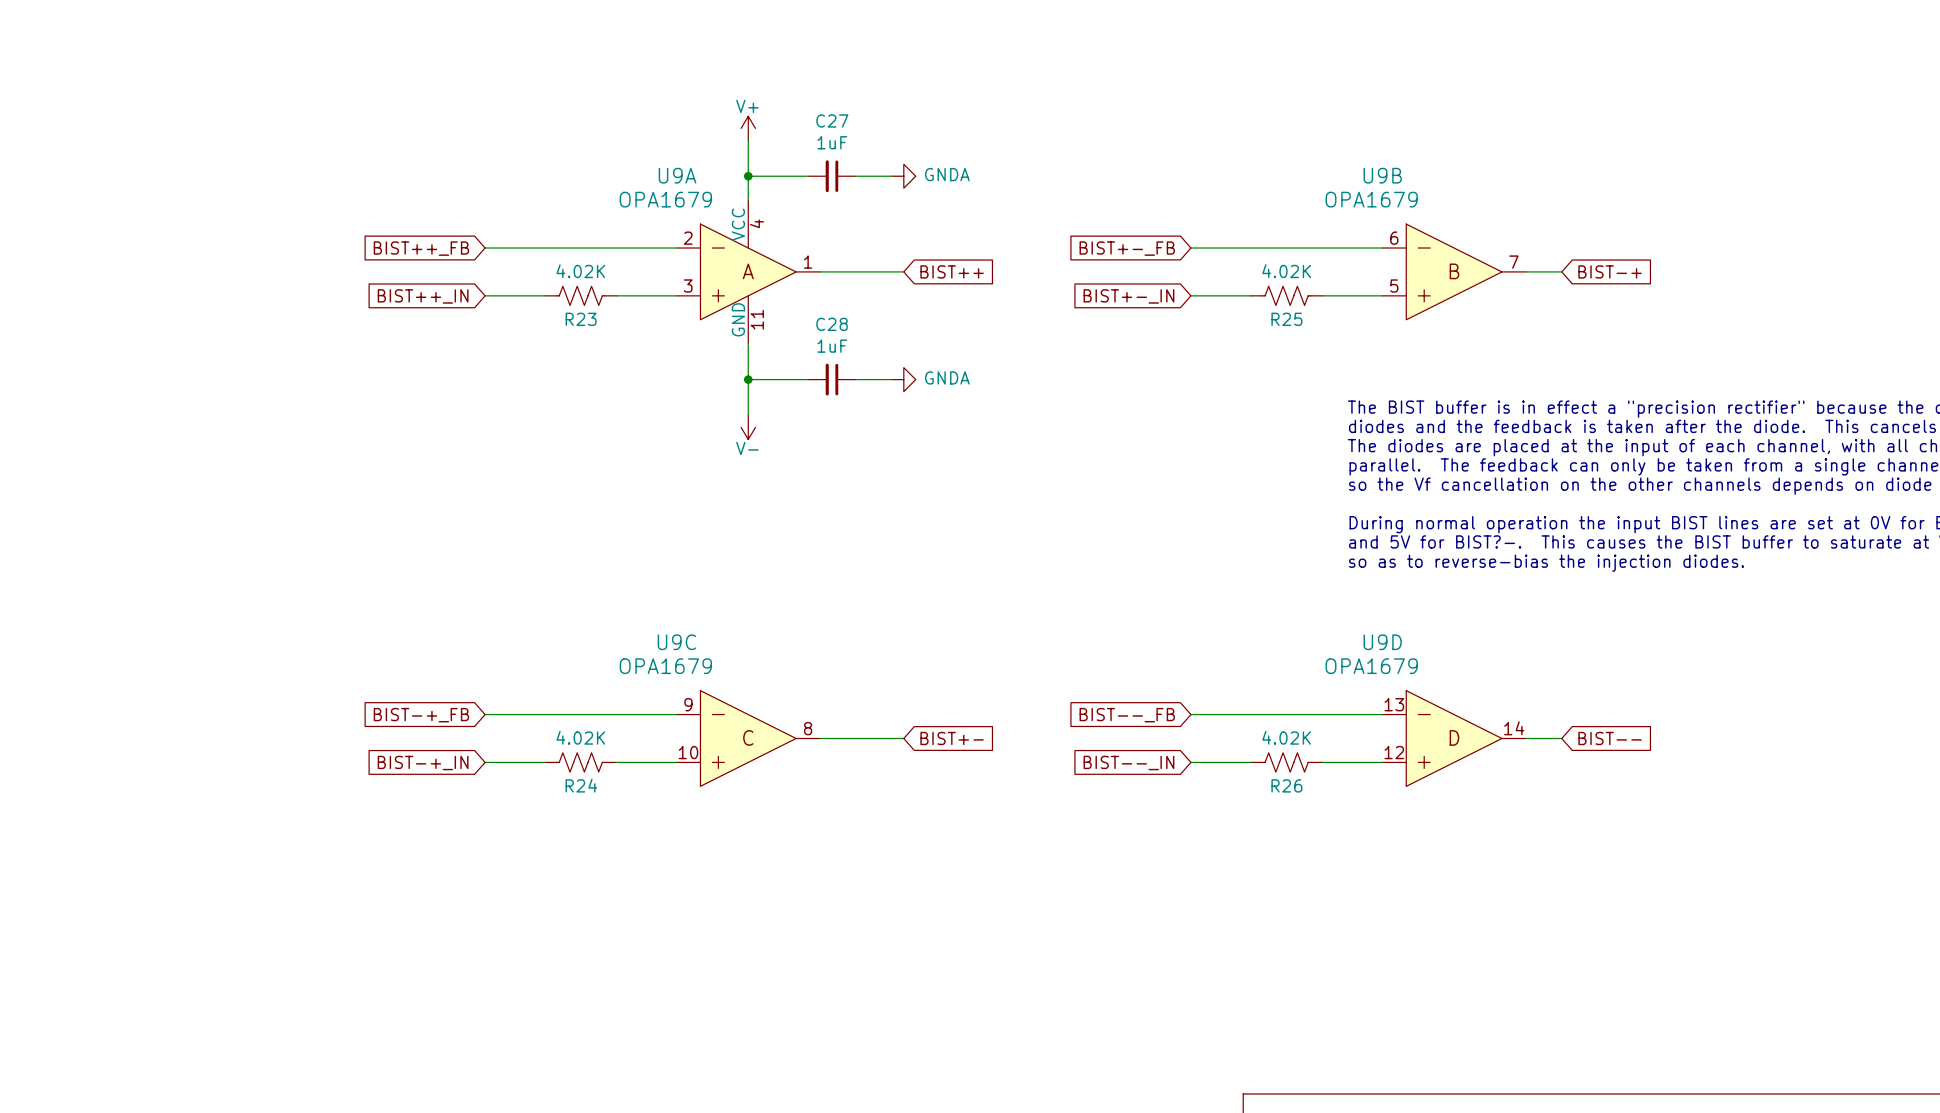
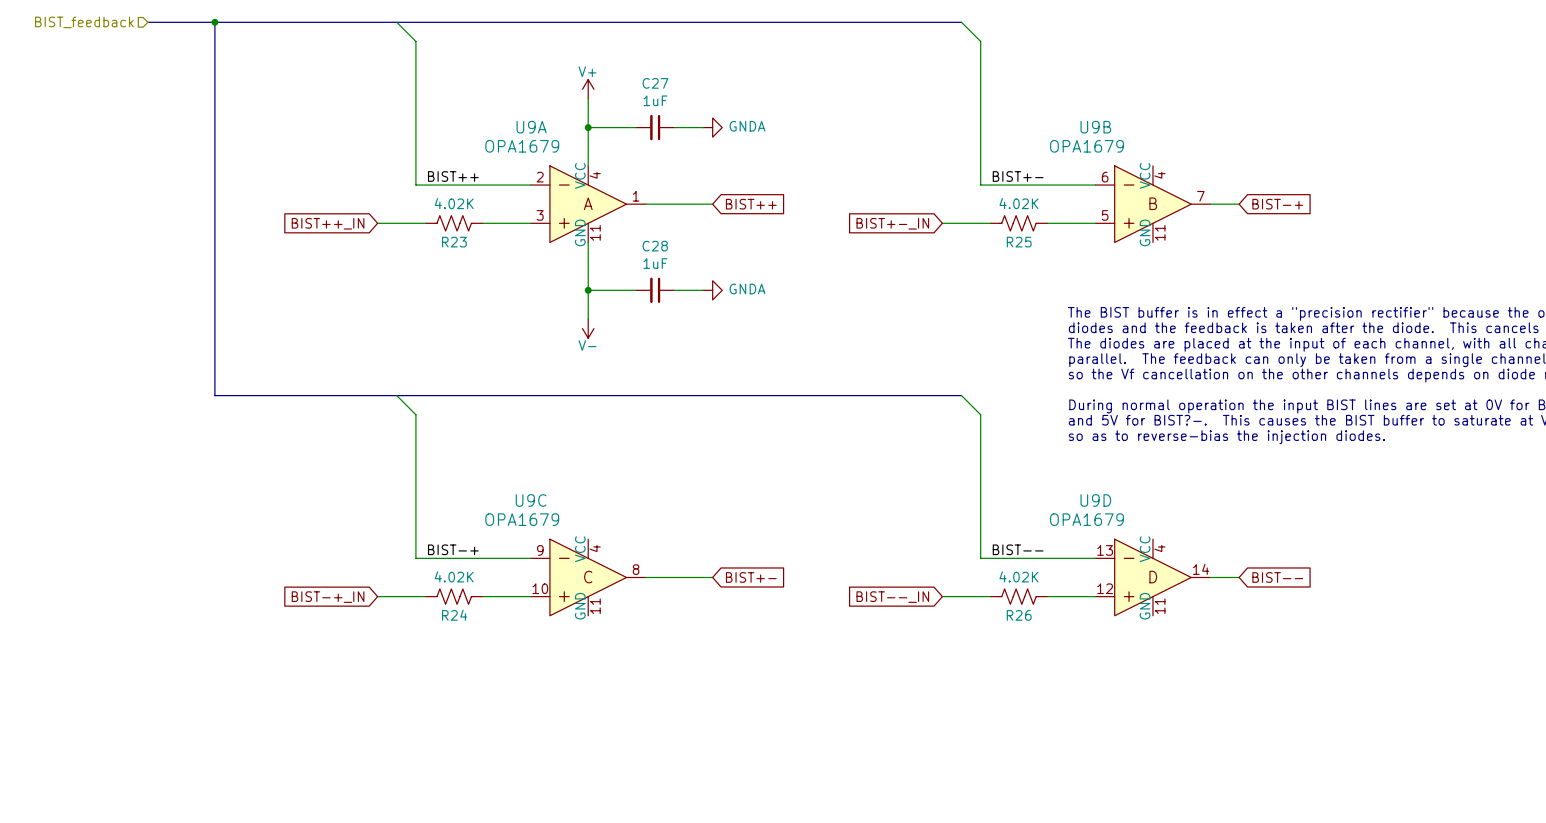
hierarchical label: none -> BIST_feedback (84, 22)
bus: none -> (147, 22) (961, 22)
bus: none -> (214, 22) (214, 395) (961, 395)
junction: none -> (214, 22)
U9A symbol: [676, 200, 821, 344] -> [530, 165, 646, 243]
U9B symbol: [1382, 224, 1526, 320] -> [1095, 165, 1211, 243]
label: none -> BIST++ (453, 176)
label: none -> BIST+- (1018, 176)
global label: BIST++_FB (421, 248) -> none
wire: (485, 248) (532, 248) -> (396, 22) (415, 41) (415, 185)
global label: BIST+-_FB (1127, 248) -> none
wire: (1190, 248) (1238, 248) -> (961, 22) (980, 41) (980, 185)
U9C symbol: [676, 690, 821, 787] -> [530, 539, 646, 616]
U9D symbol: [1382, 690, 1526, 787] -> [1095, 539, 1211, 616]
label: none -> BIST-+ (453, 549)
label: none -> BIST-- (1018, 549)
wire: (485, 714) (532, 714) -> (396, 395) (415, 414) (415, 558)
wire: (1190, 714) (1238, 714) -> (961, 395) (980, 414) (980, 558)
global label: BIST-+_FB (421, 715) -> none
global label: BIST--_FB (1127, 715) -> none

